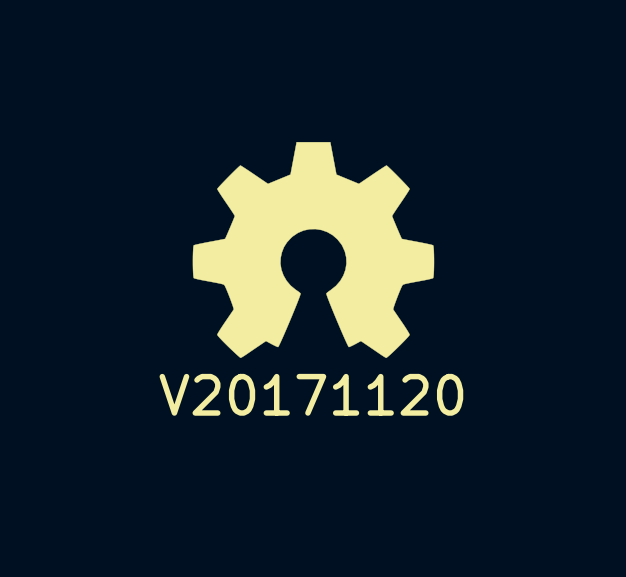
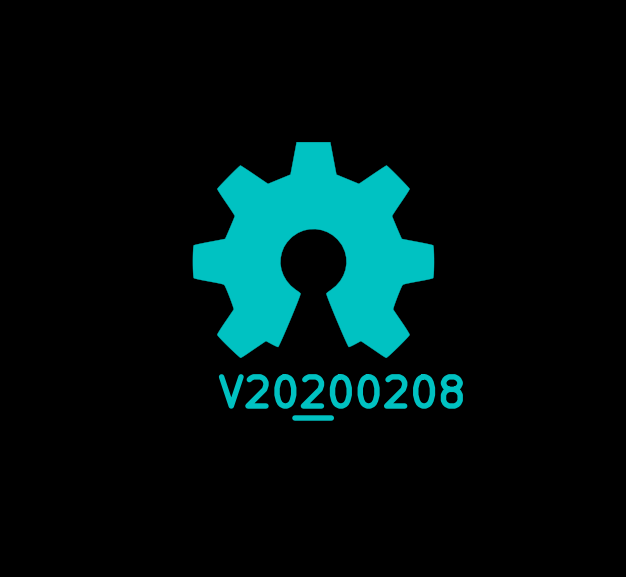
drawing shape: [159, 373, 464, 416] -> [218, 374, 463, 421]

